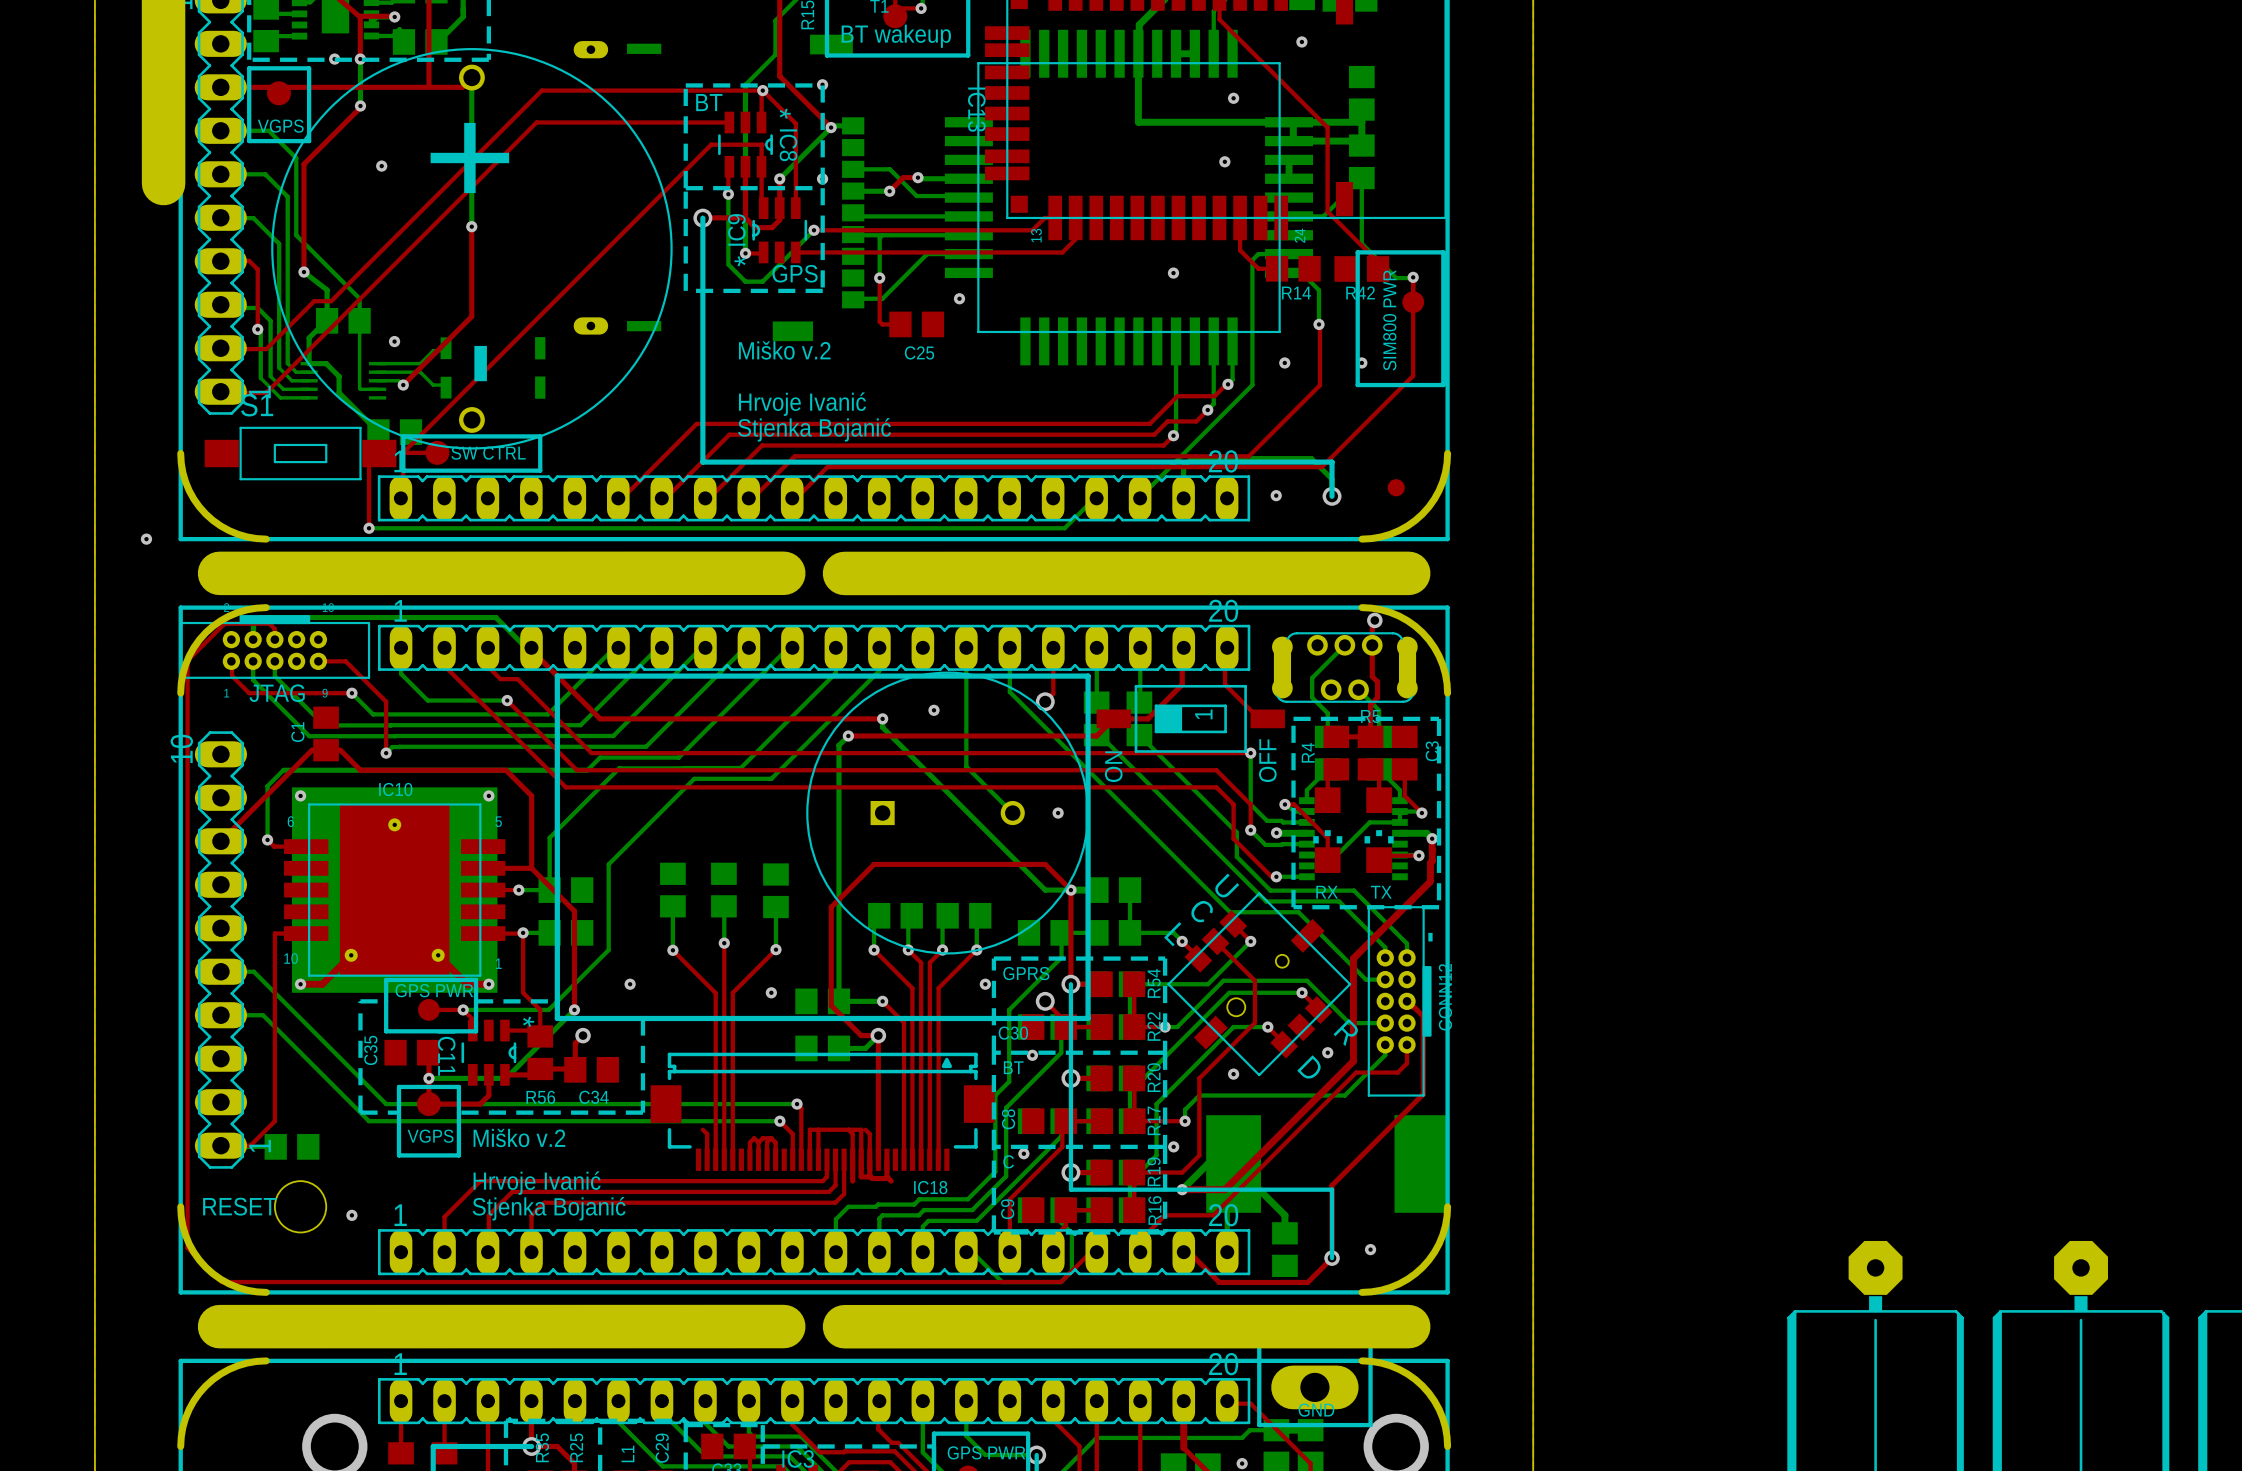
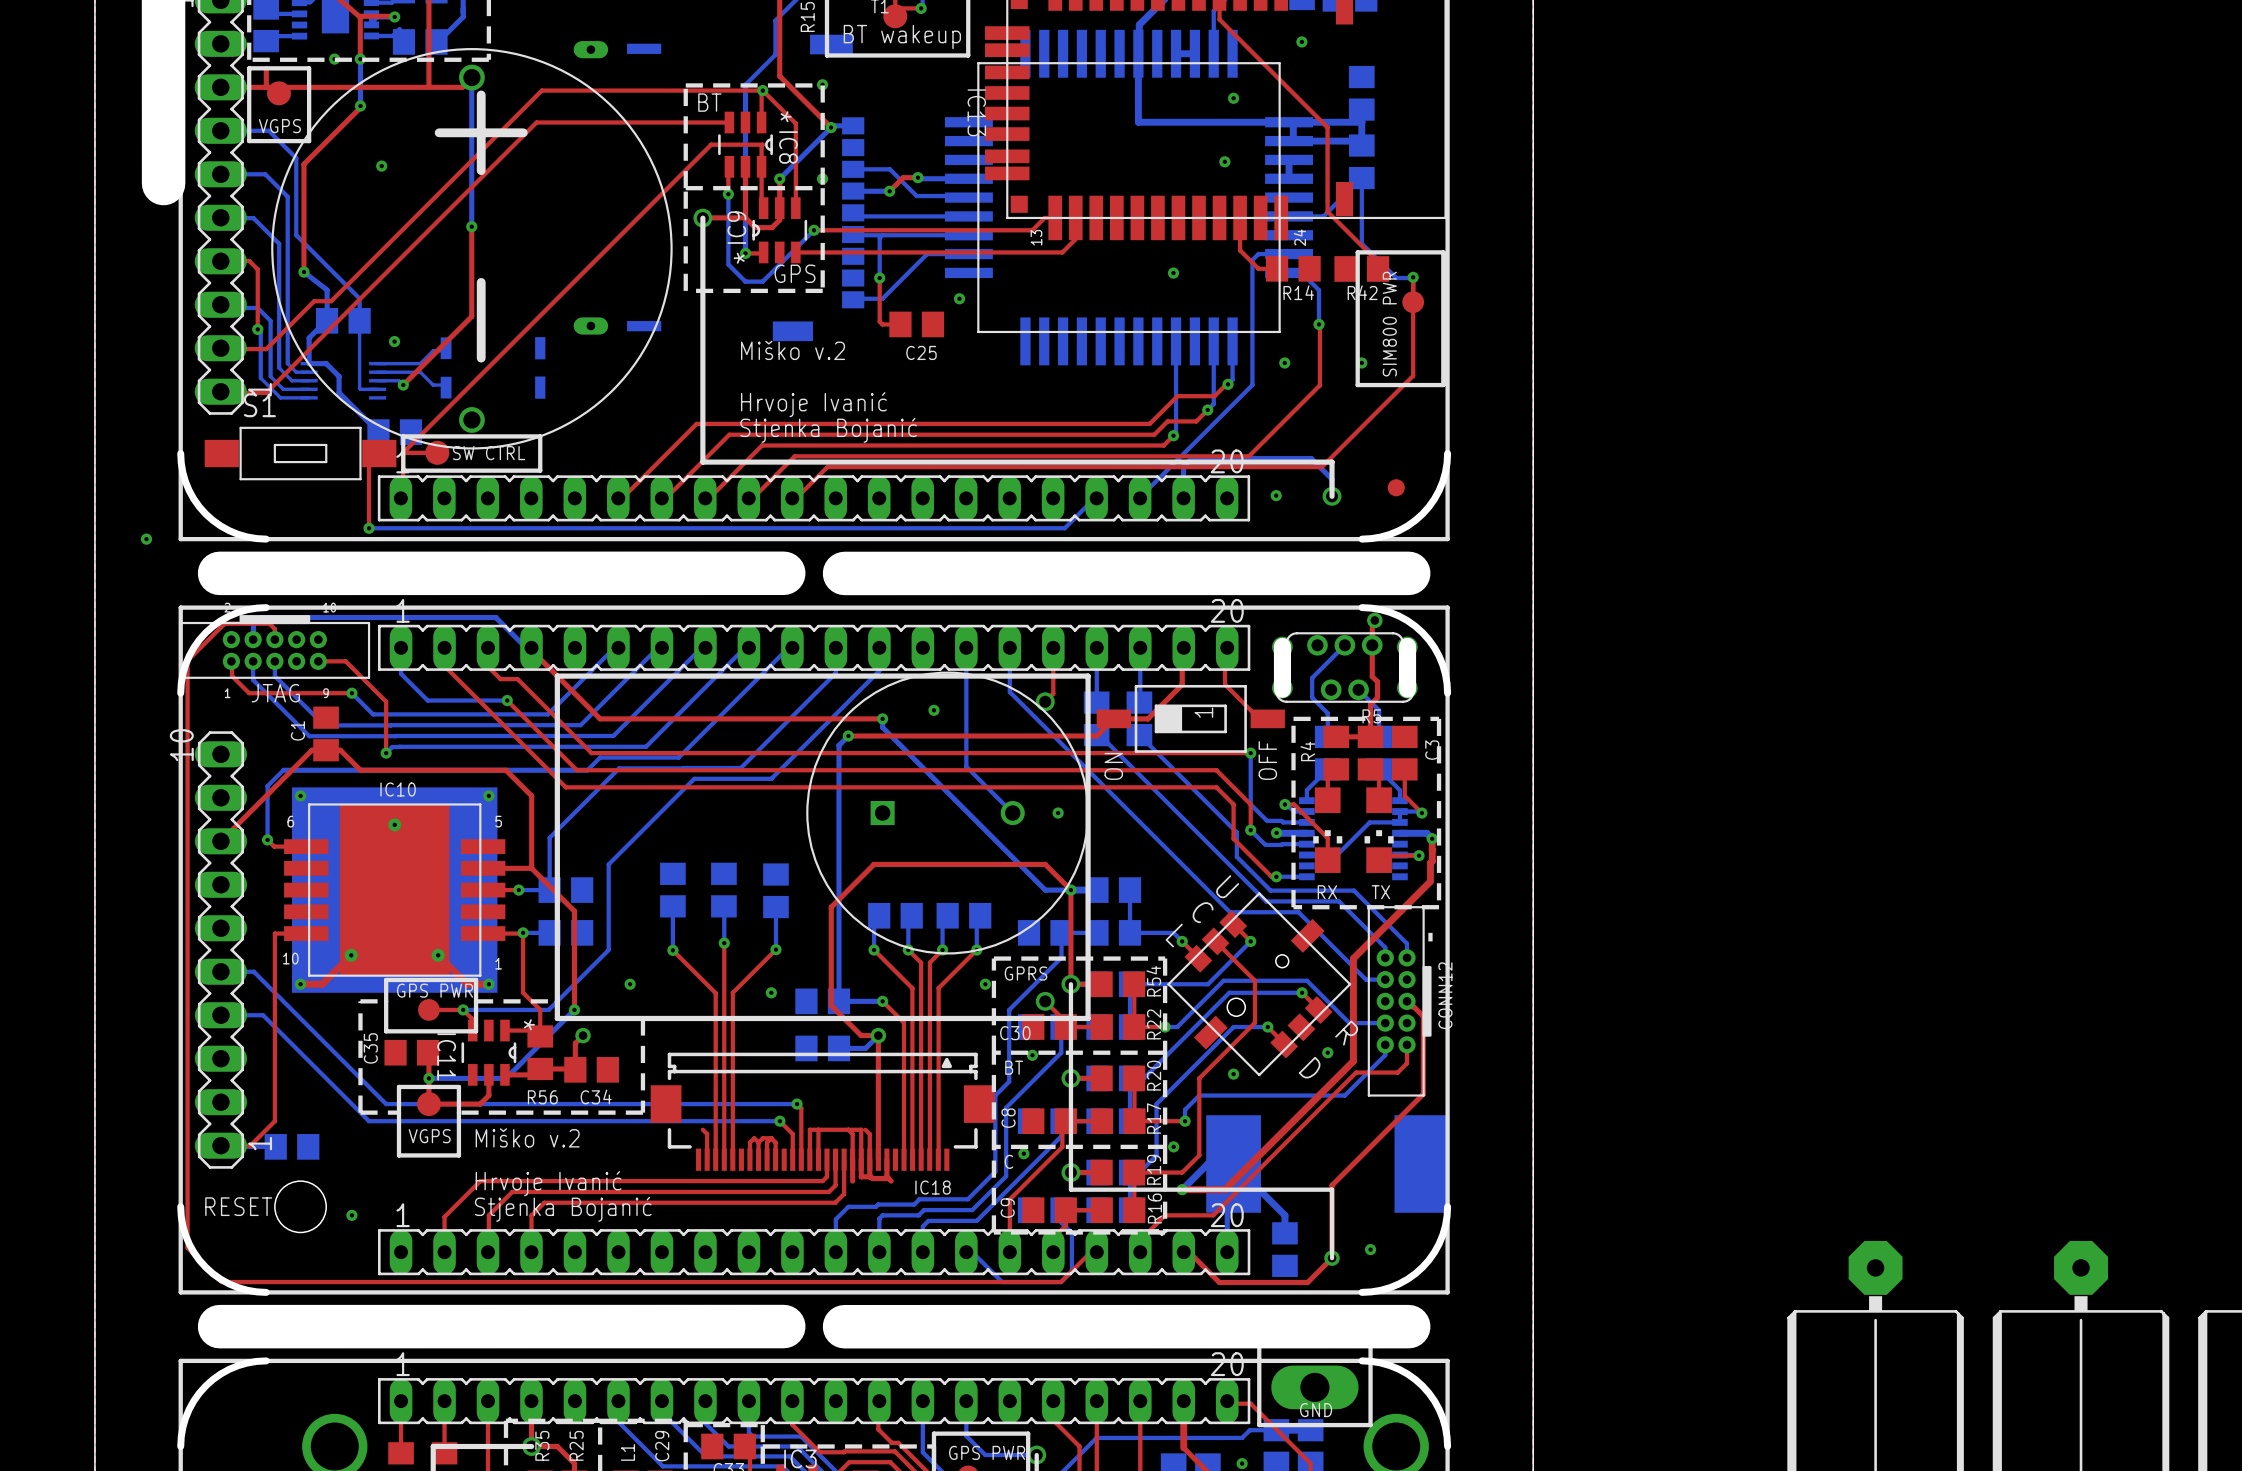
top track: none -> (266, 68) (266, 87)

